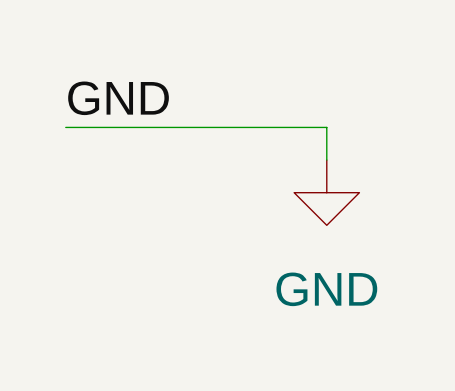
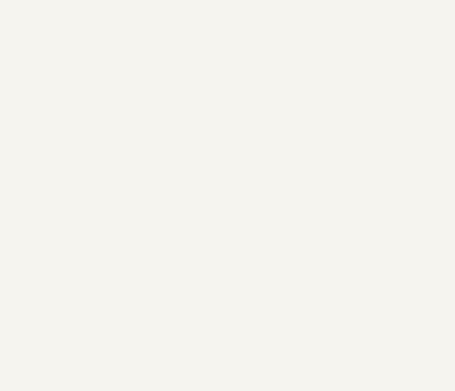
label: GND (118, 98) -> none
wire: (65, 127) (326, 127) (326, 160) -> none
power symbol: GND (326, 192) -> none

